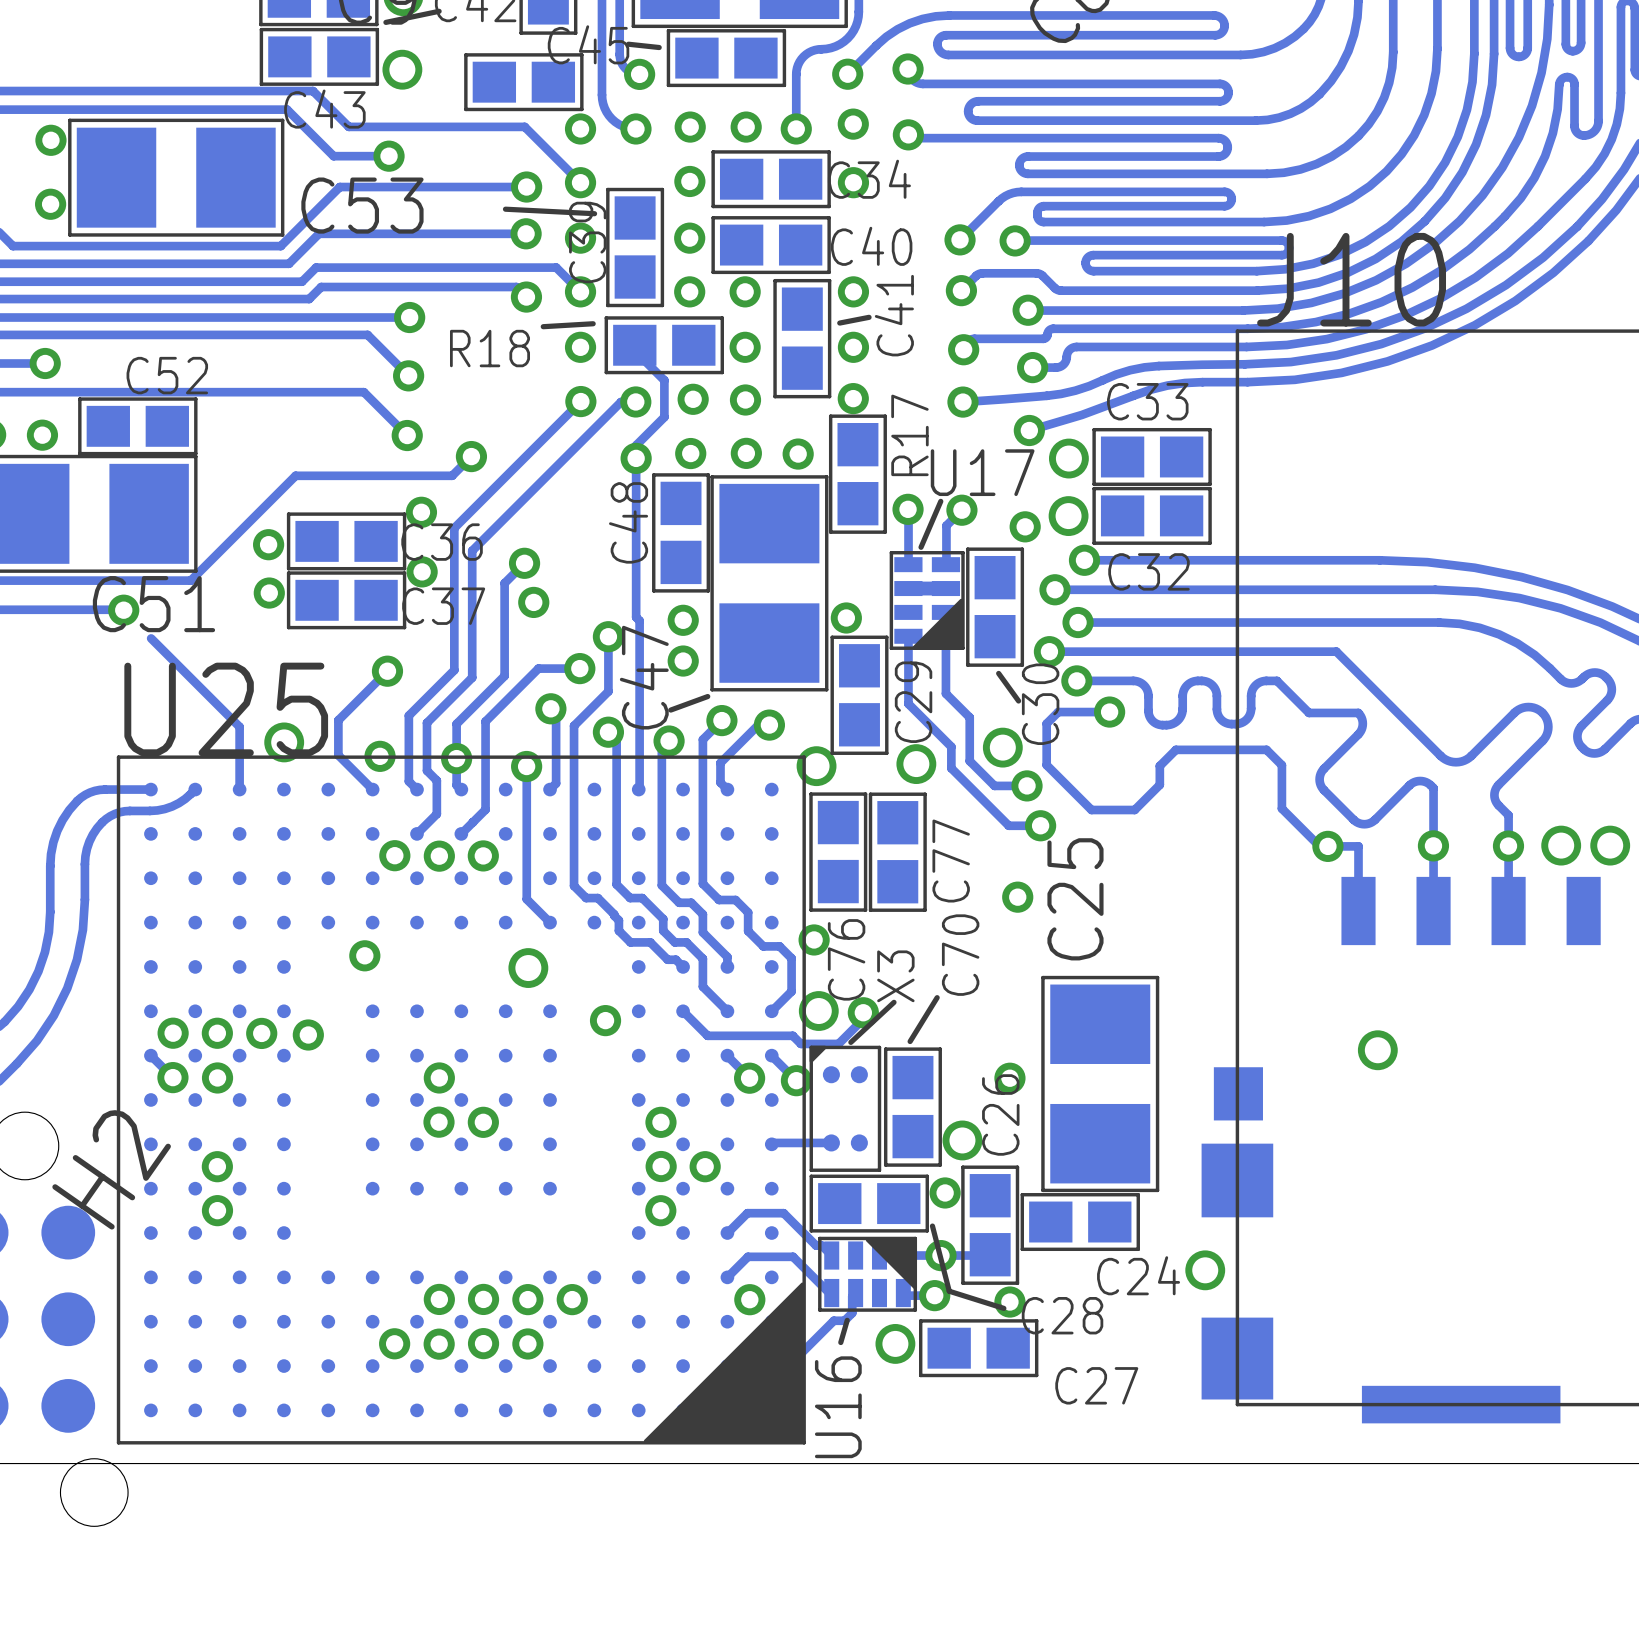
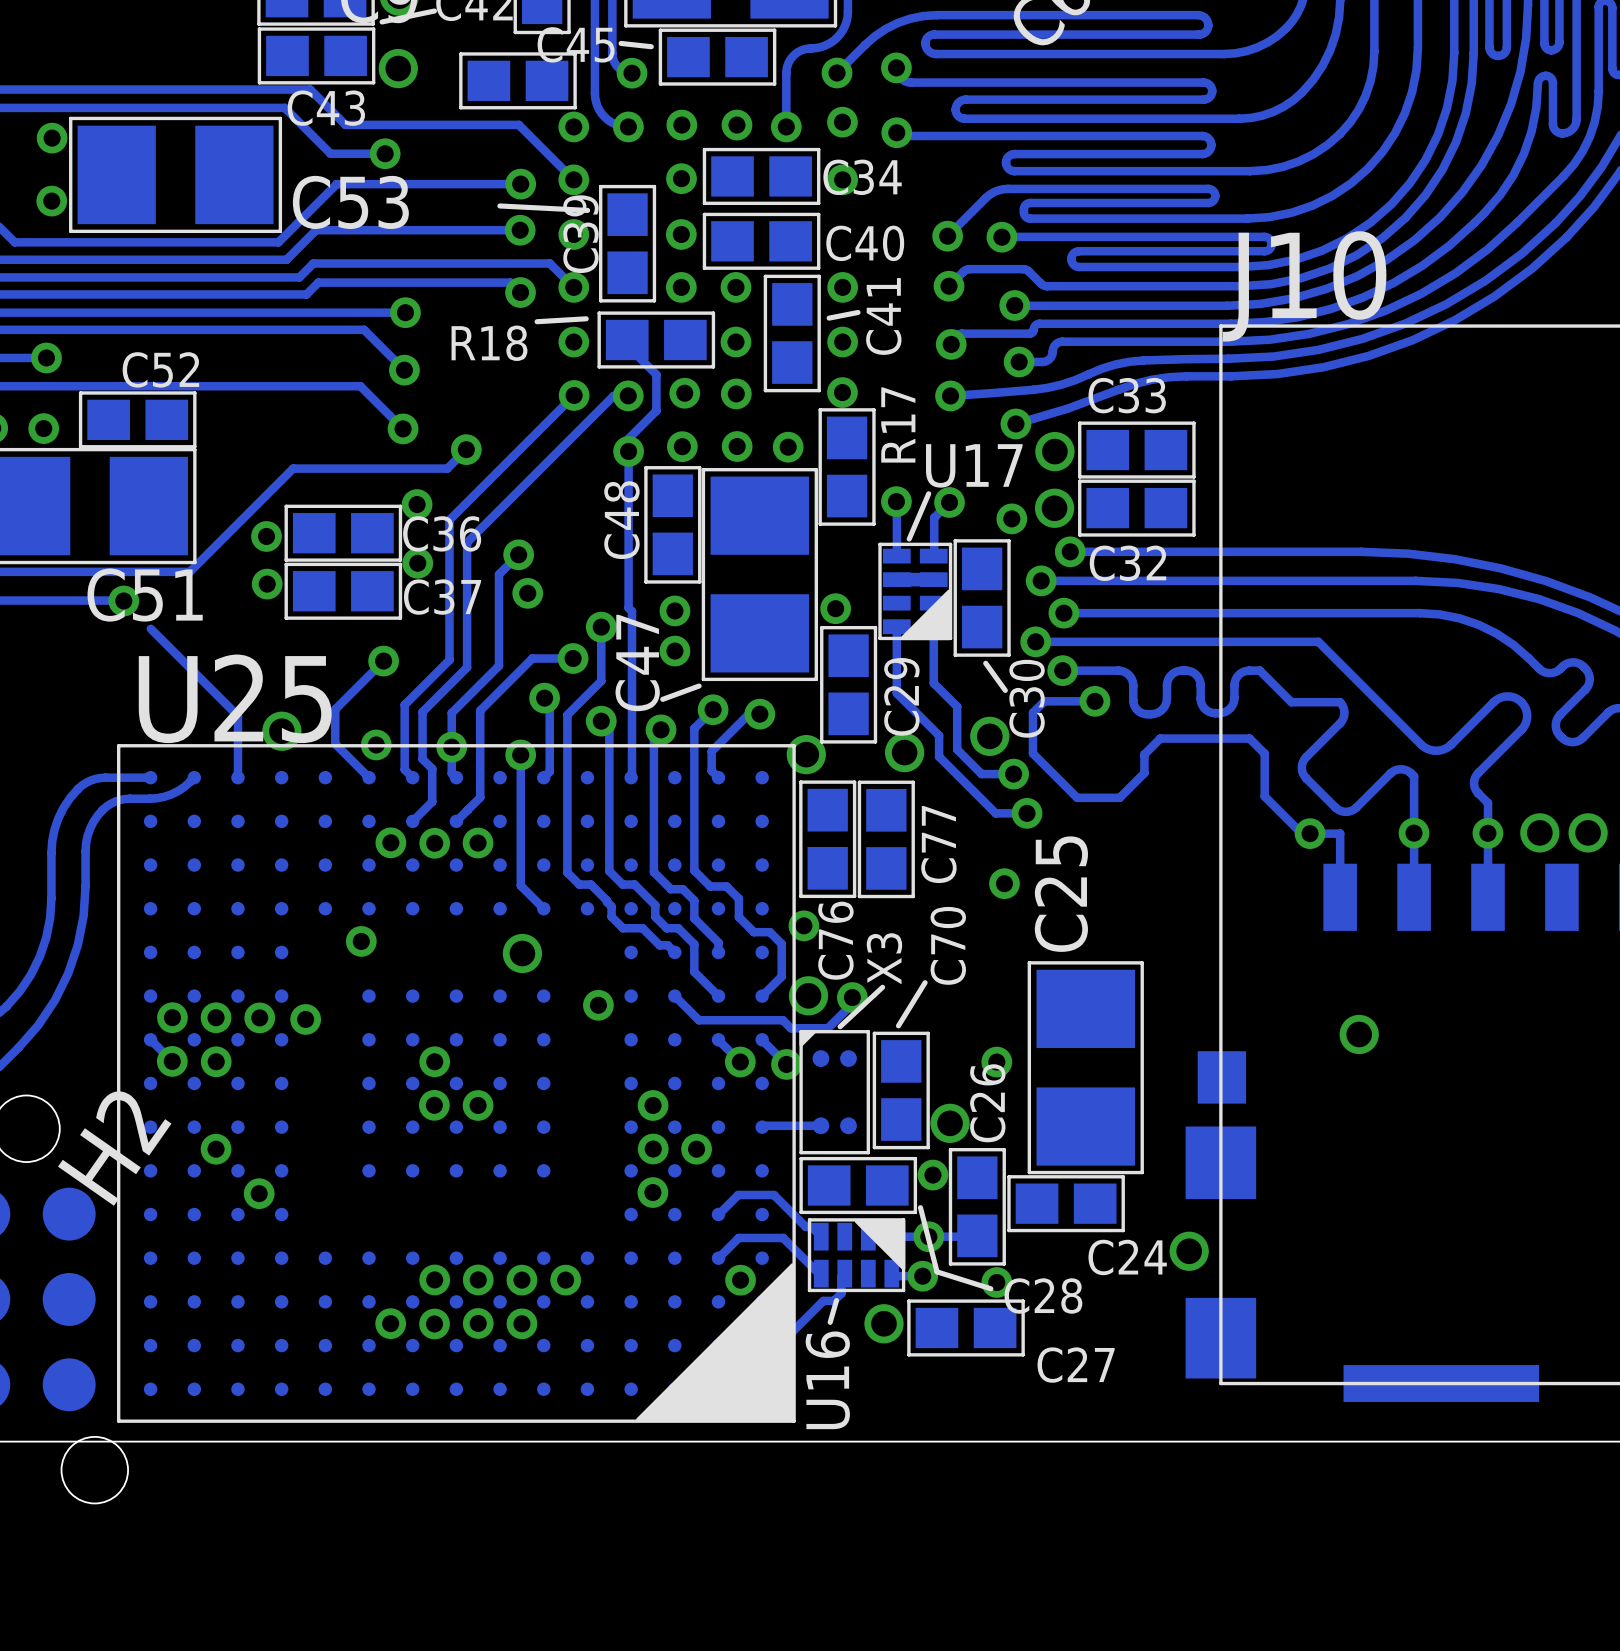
via position: (217, 1210) -> (259, 1193)

